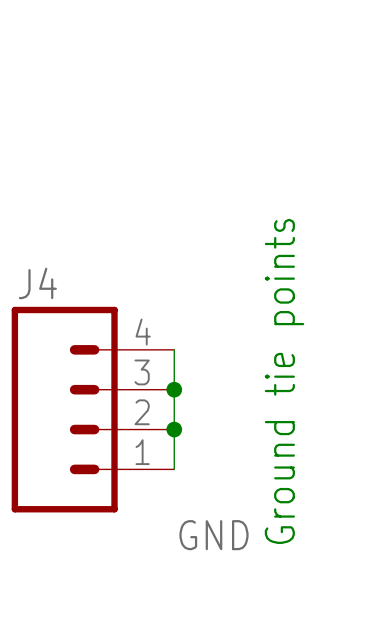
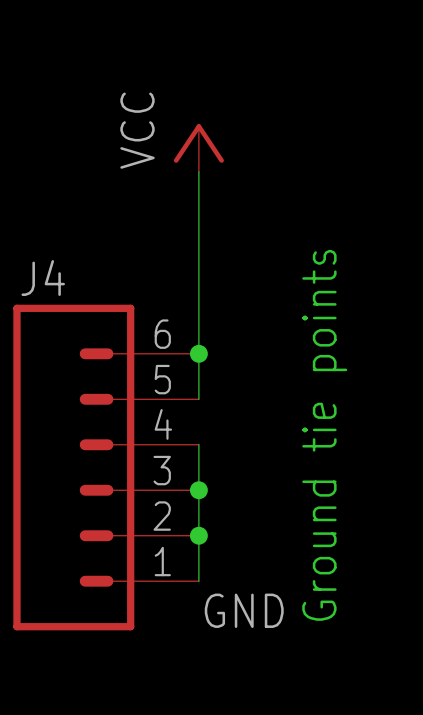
power symbol: none -> VCC (198, 148)
J4 name position: J4 (37, 283) -> J4 (43, 278)
J4 symbol: [11, 306, 175, 513] -> [13, 304, 199, 631]
junction: none -> (198, 353)
wire: (174, 349) (174, 389) -> (198, 399) (198, 171)
junction: (174, 389) -> none
wire: none -> (198, 535) (198, 581)
junction: none -> (198, 535)

